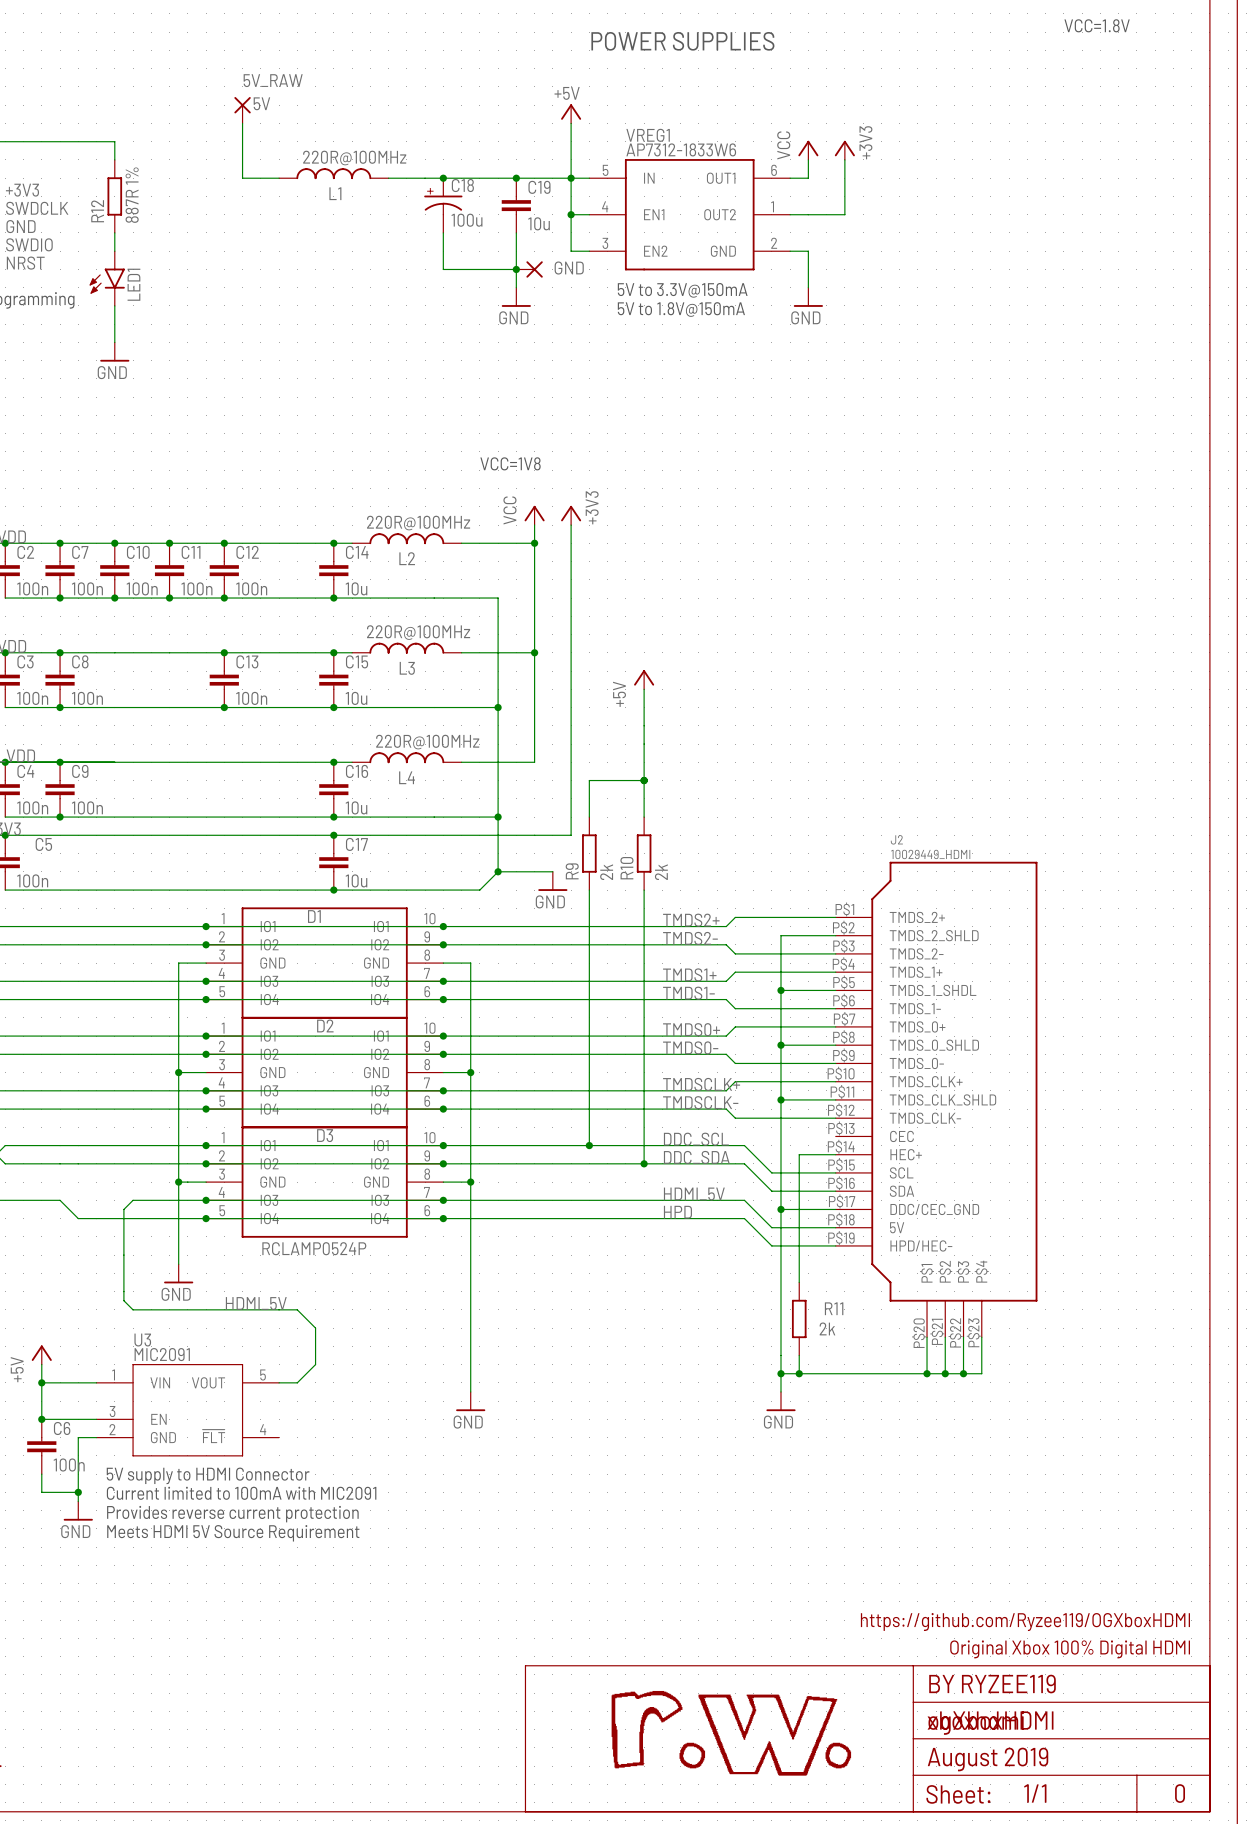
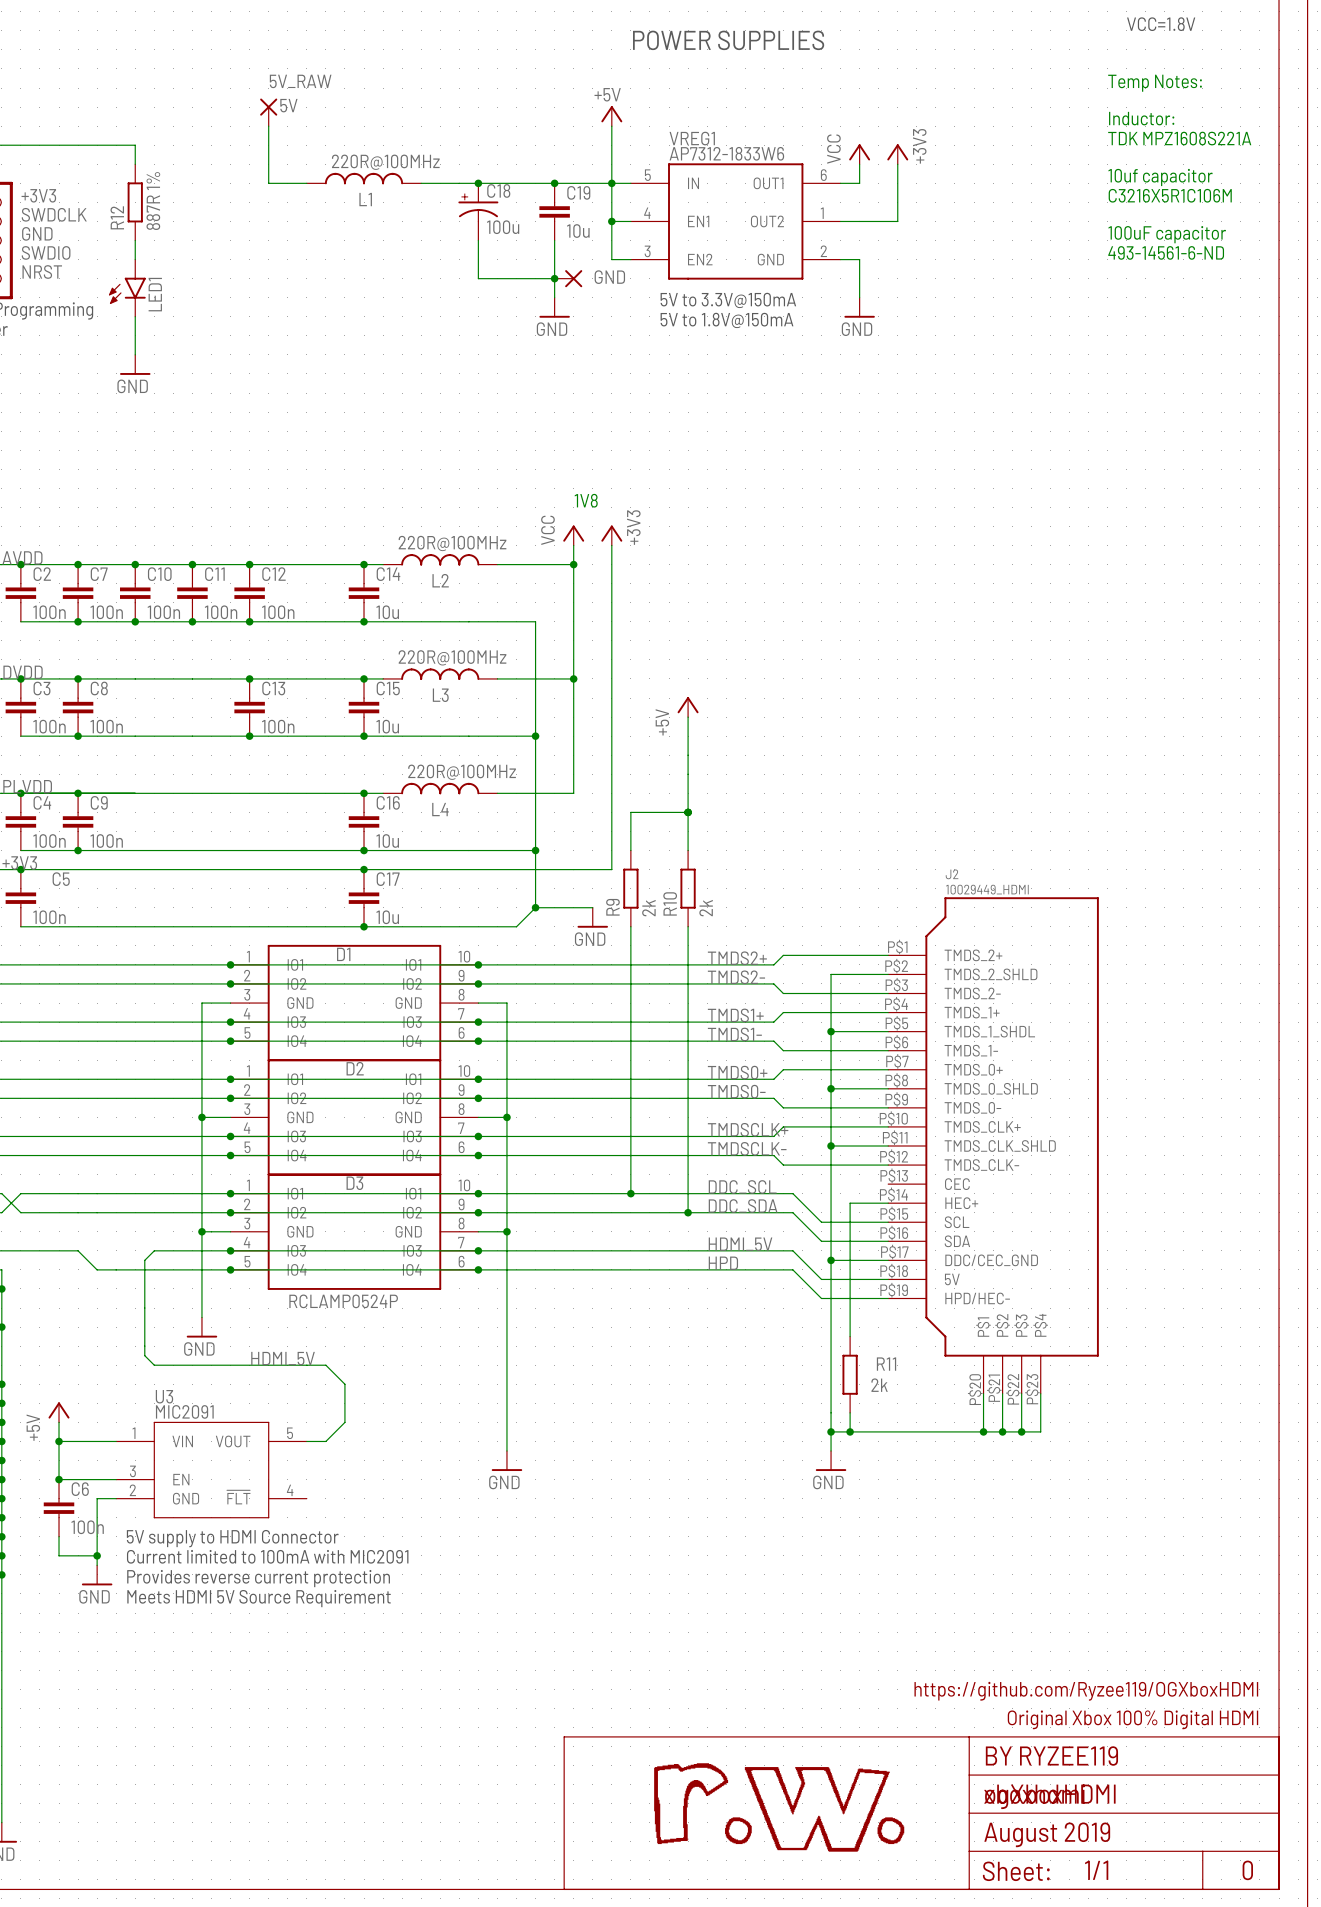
text: none -> Temp Notes: (1155, 83)
text: none -> Inductor: (1141, 118)
text: none -> TDK MPZ1608S221A (1179, 138)
text: none -> 10uf capacitor (1160, 177)
text: none -> C3216X5R1C106M (1170, 195)
text: none -> 100uF capacitor (1167, 234)
text: none -> 493-14561-6-ND (1166, 252)
text: VCC=1V8 (510, 463) -> none
text: none -> 1V8 (586, 500)

